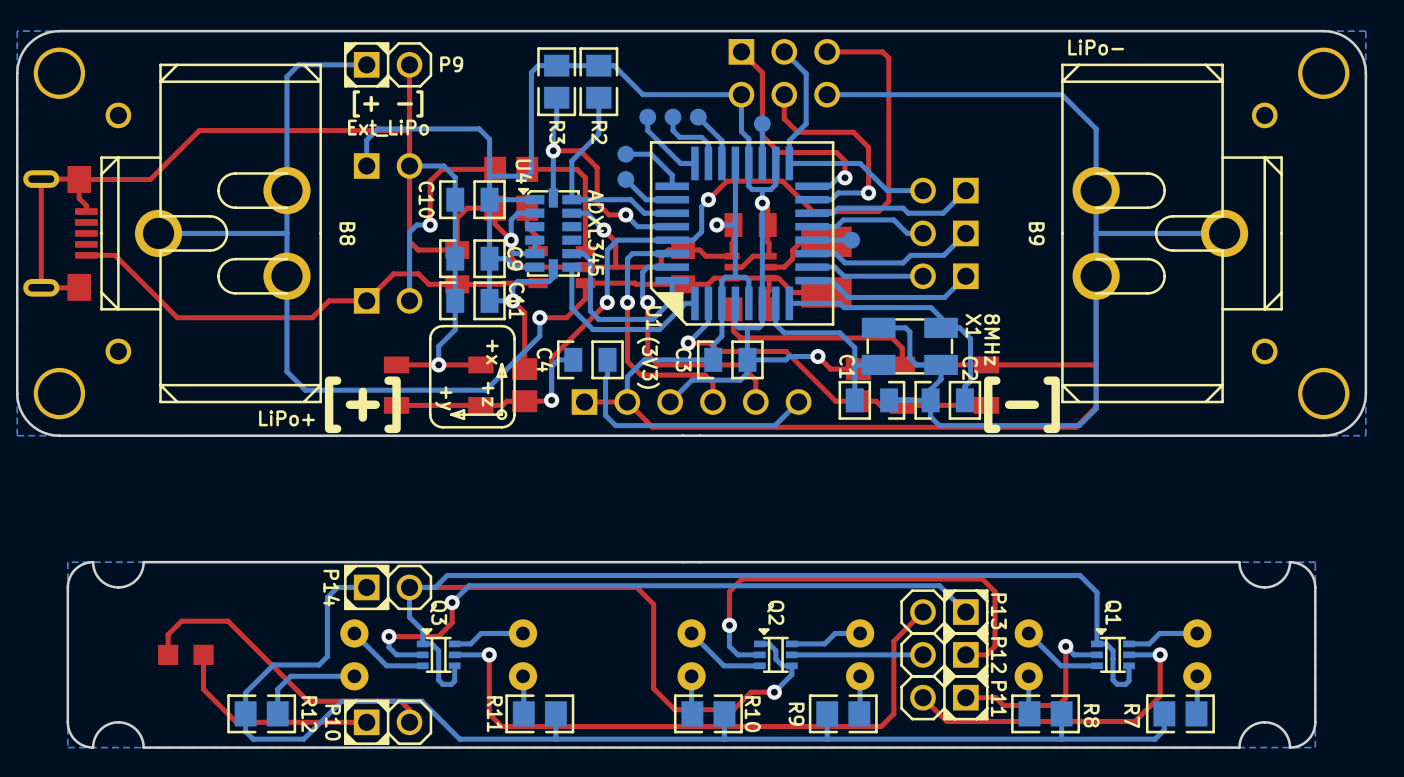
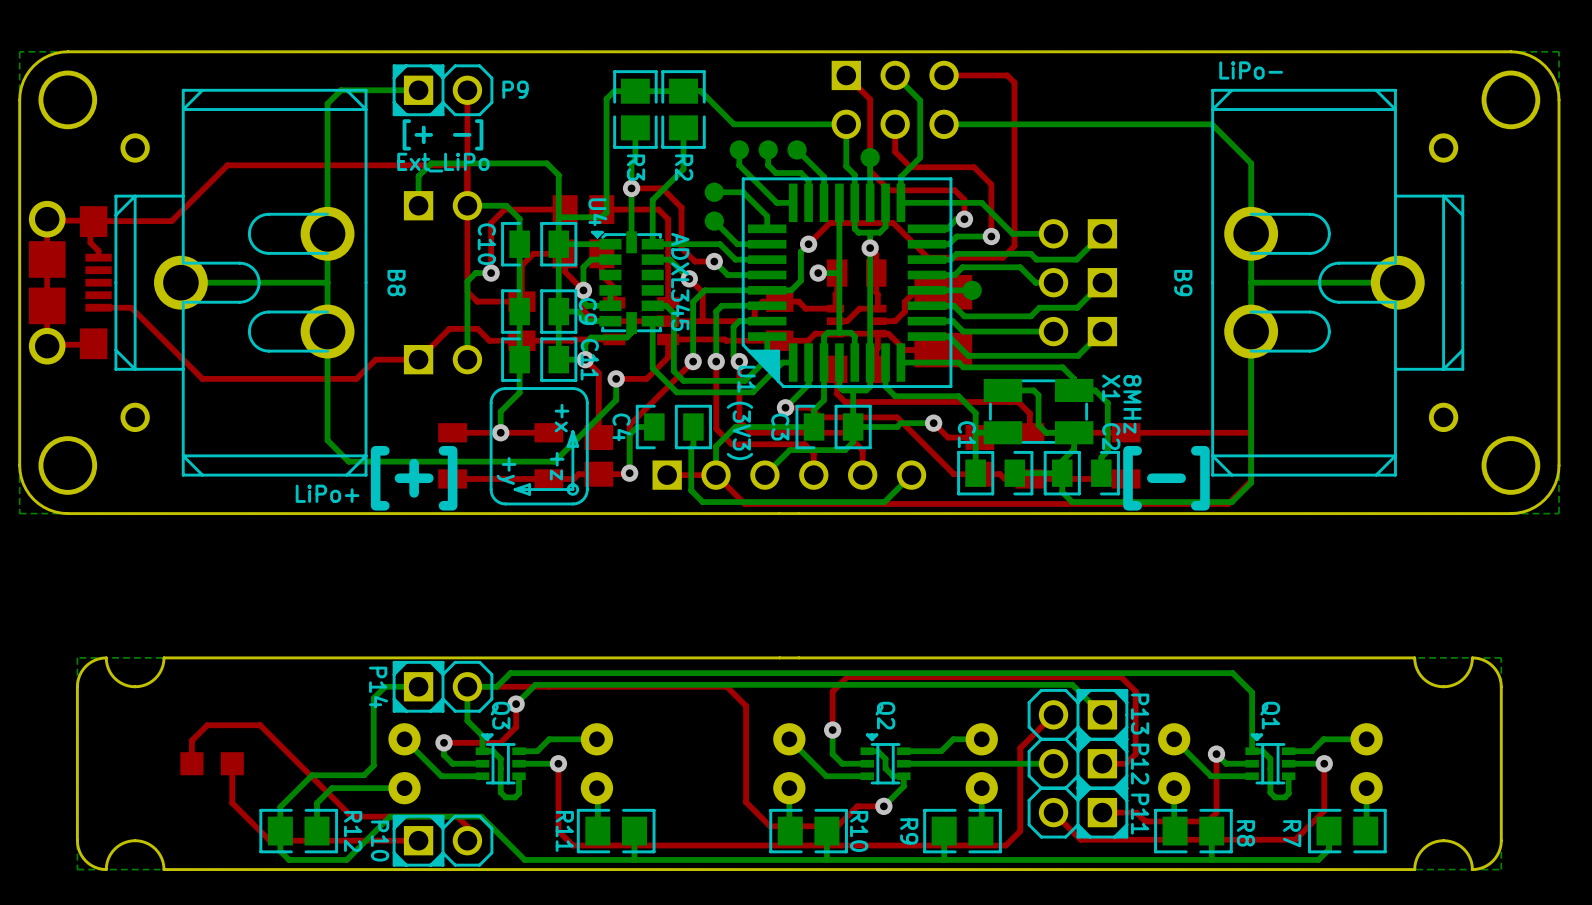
part footprint: [23, 166, 98, 301] -> [28, 200, 112, 365]
C2 rotation: 0° (947, 400) -> 180° (1081, 473)

